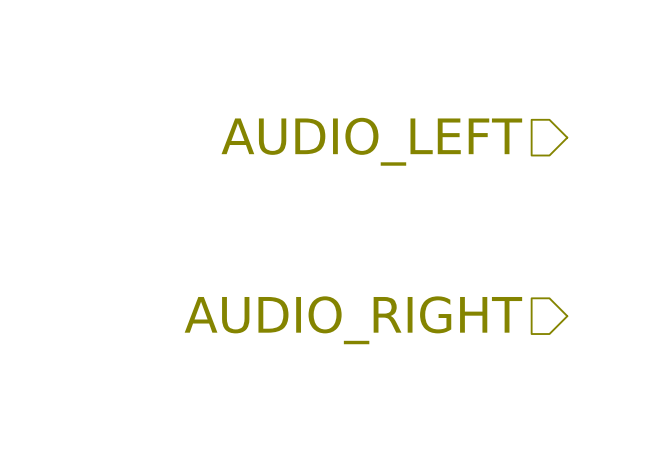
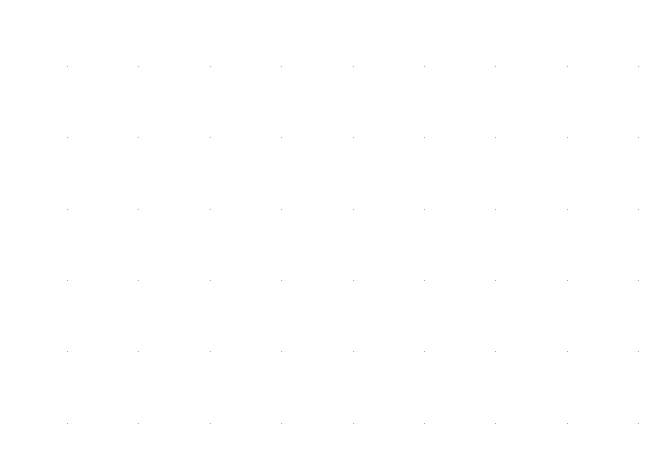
hierarchical label: AUDIO_LEFT (371, 141) -> none
hierarchical label: AUDIO_RIGHT (353, 320) -> none

